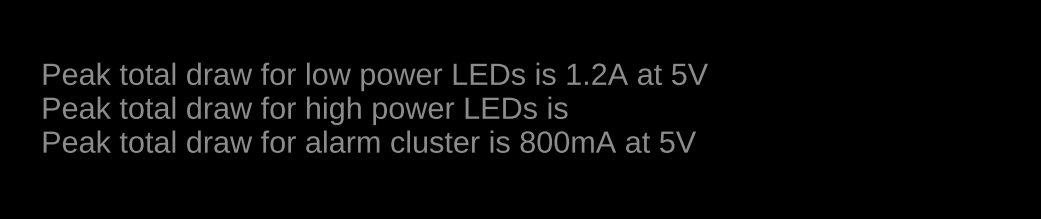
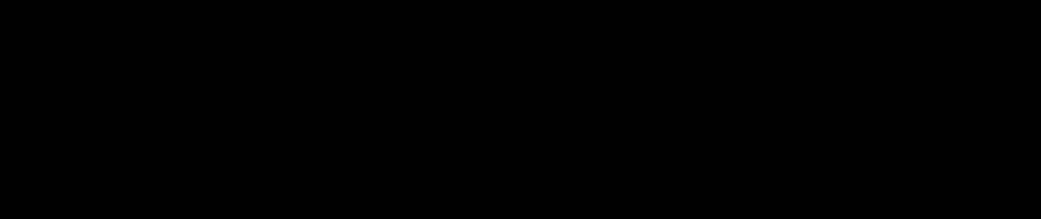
text: Peak total draw for low power LEDs is 1.2A at 5V (375, 76) -> none
text: Peak total draw for high power LEDs is (305, 110) -> none
text: Peak total draw for alarm cluster is 800mA at 5V (369, 141) -> none

